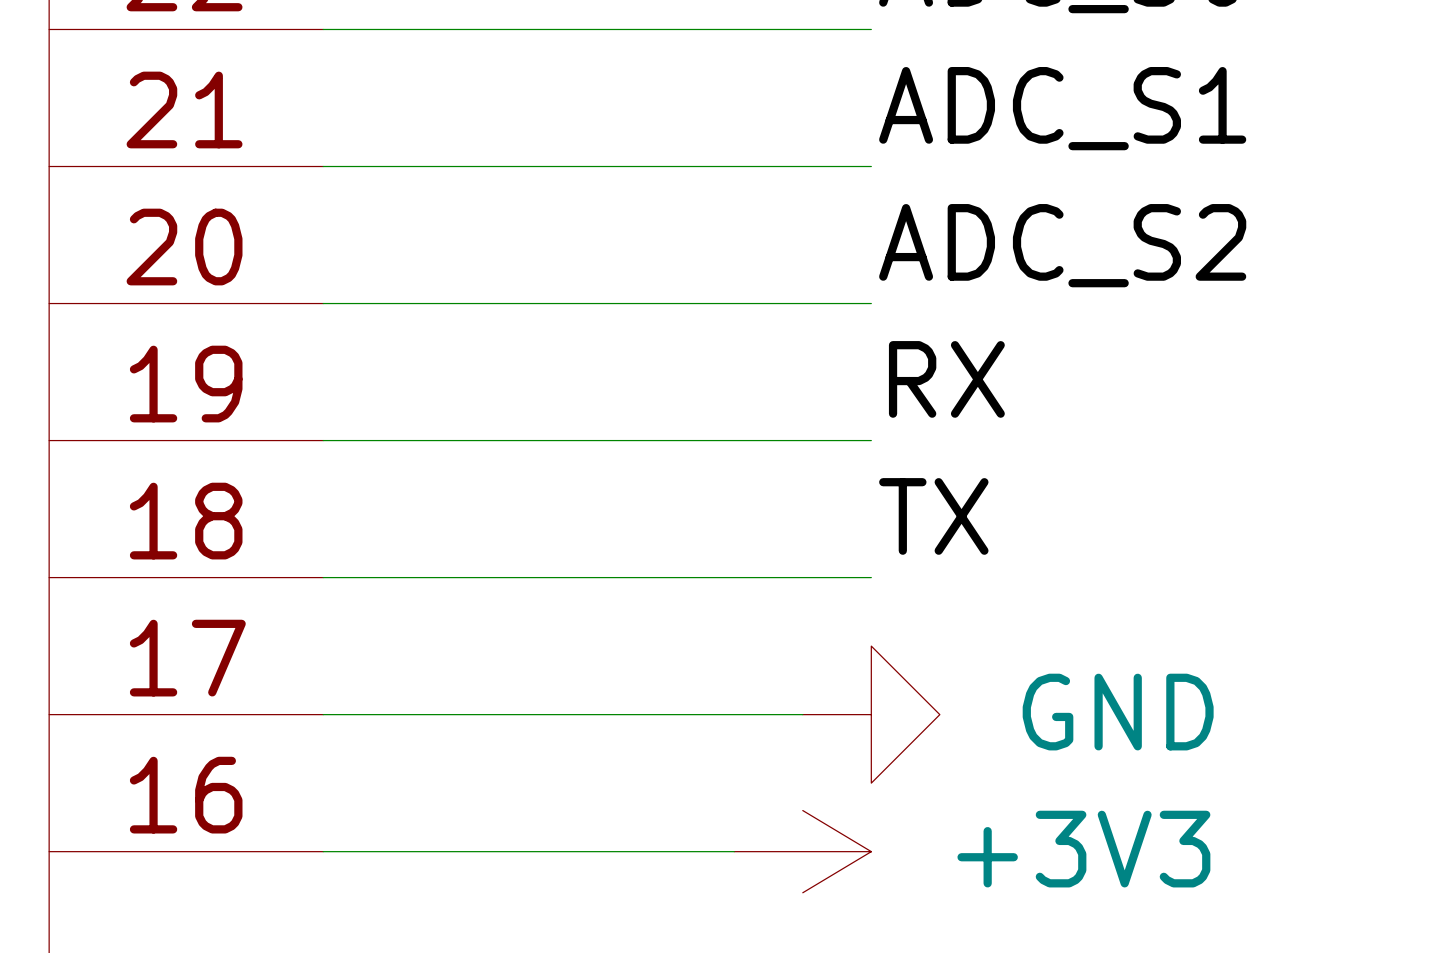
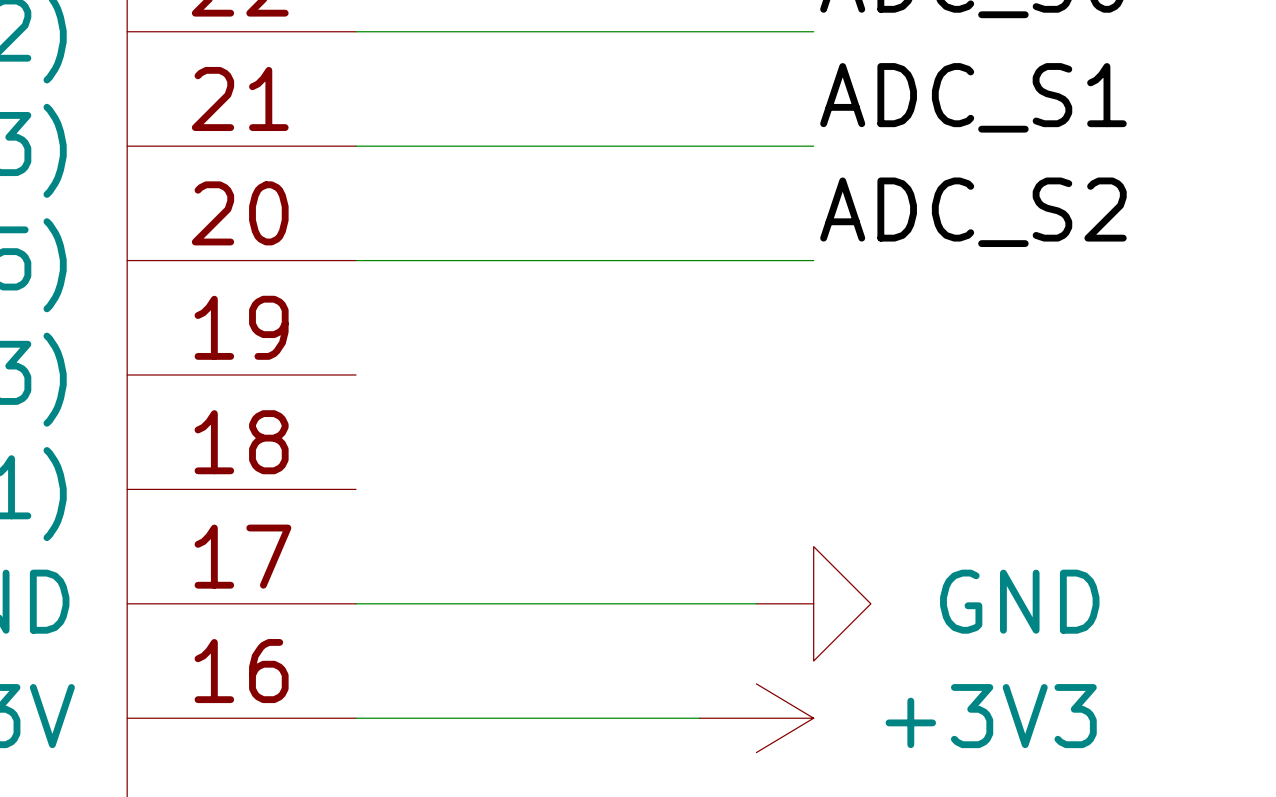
label: RX (946, 379) -> none
wire: (323, 440) (871, 440) -> none
label: TX (933, 516) -> none
wire: (323, 577) (871, 577) -> none

